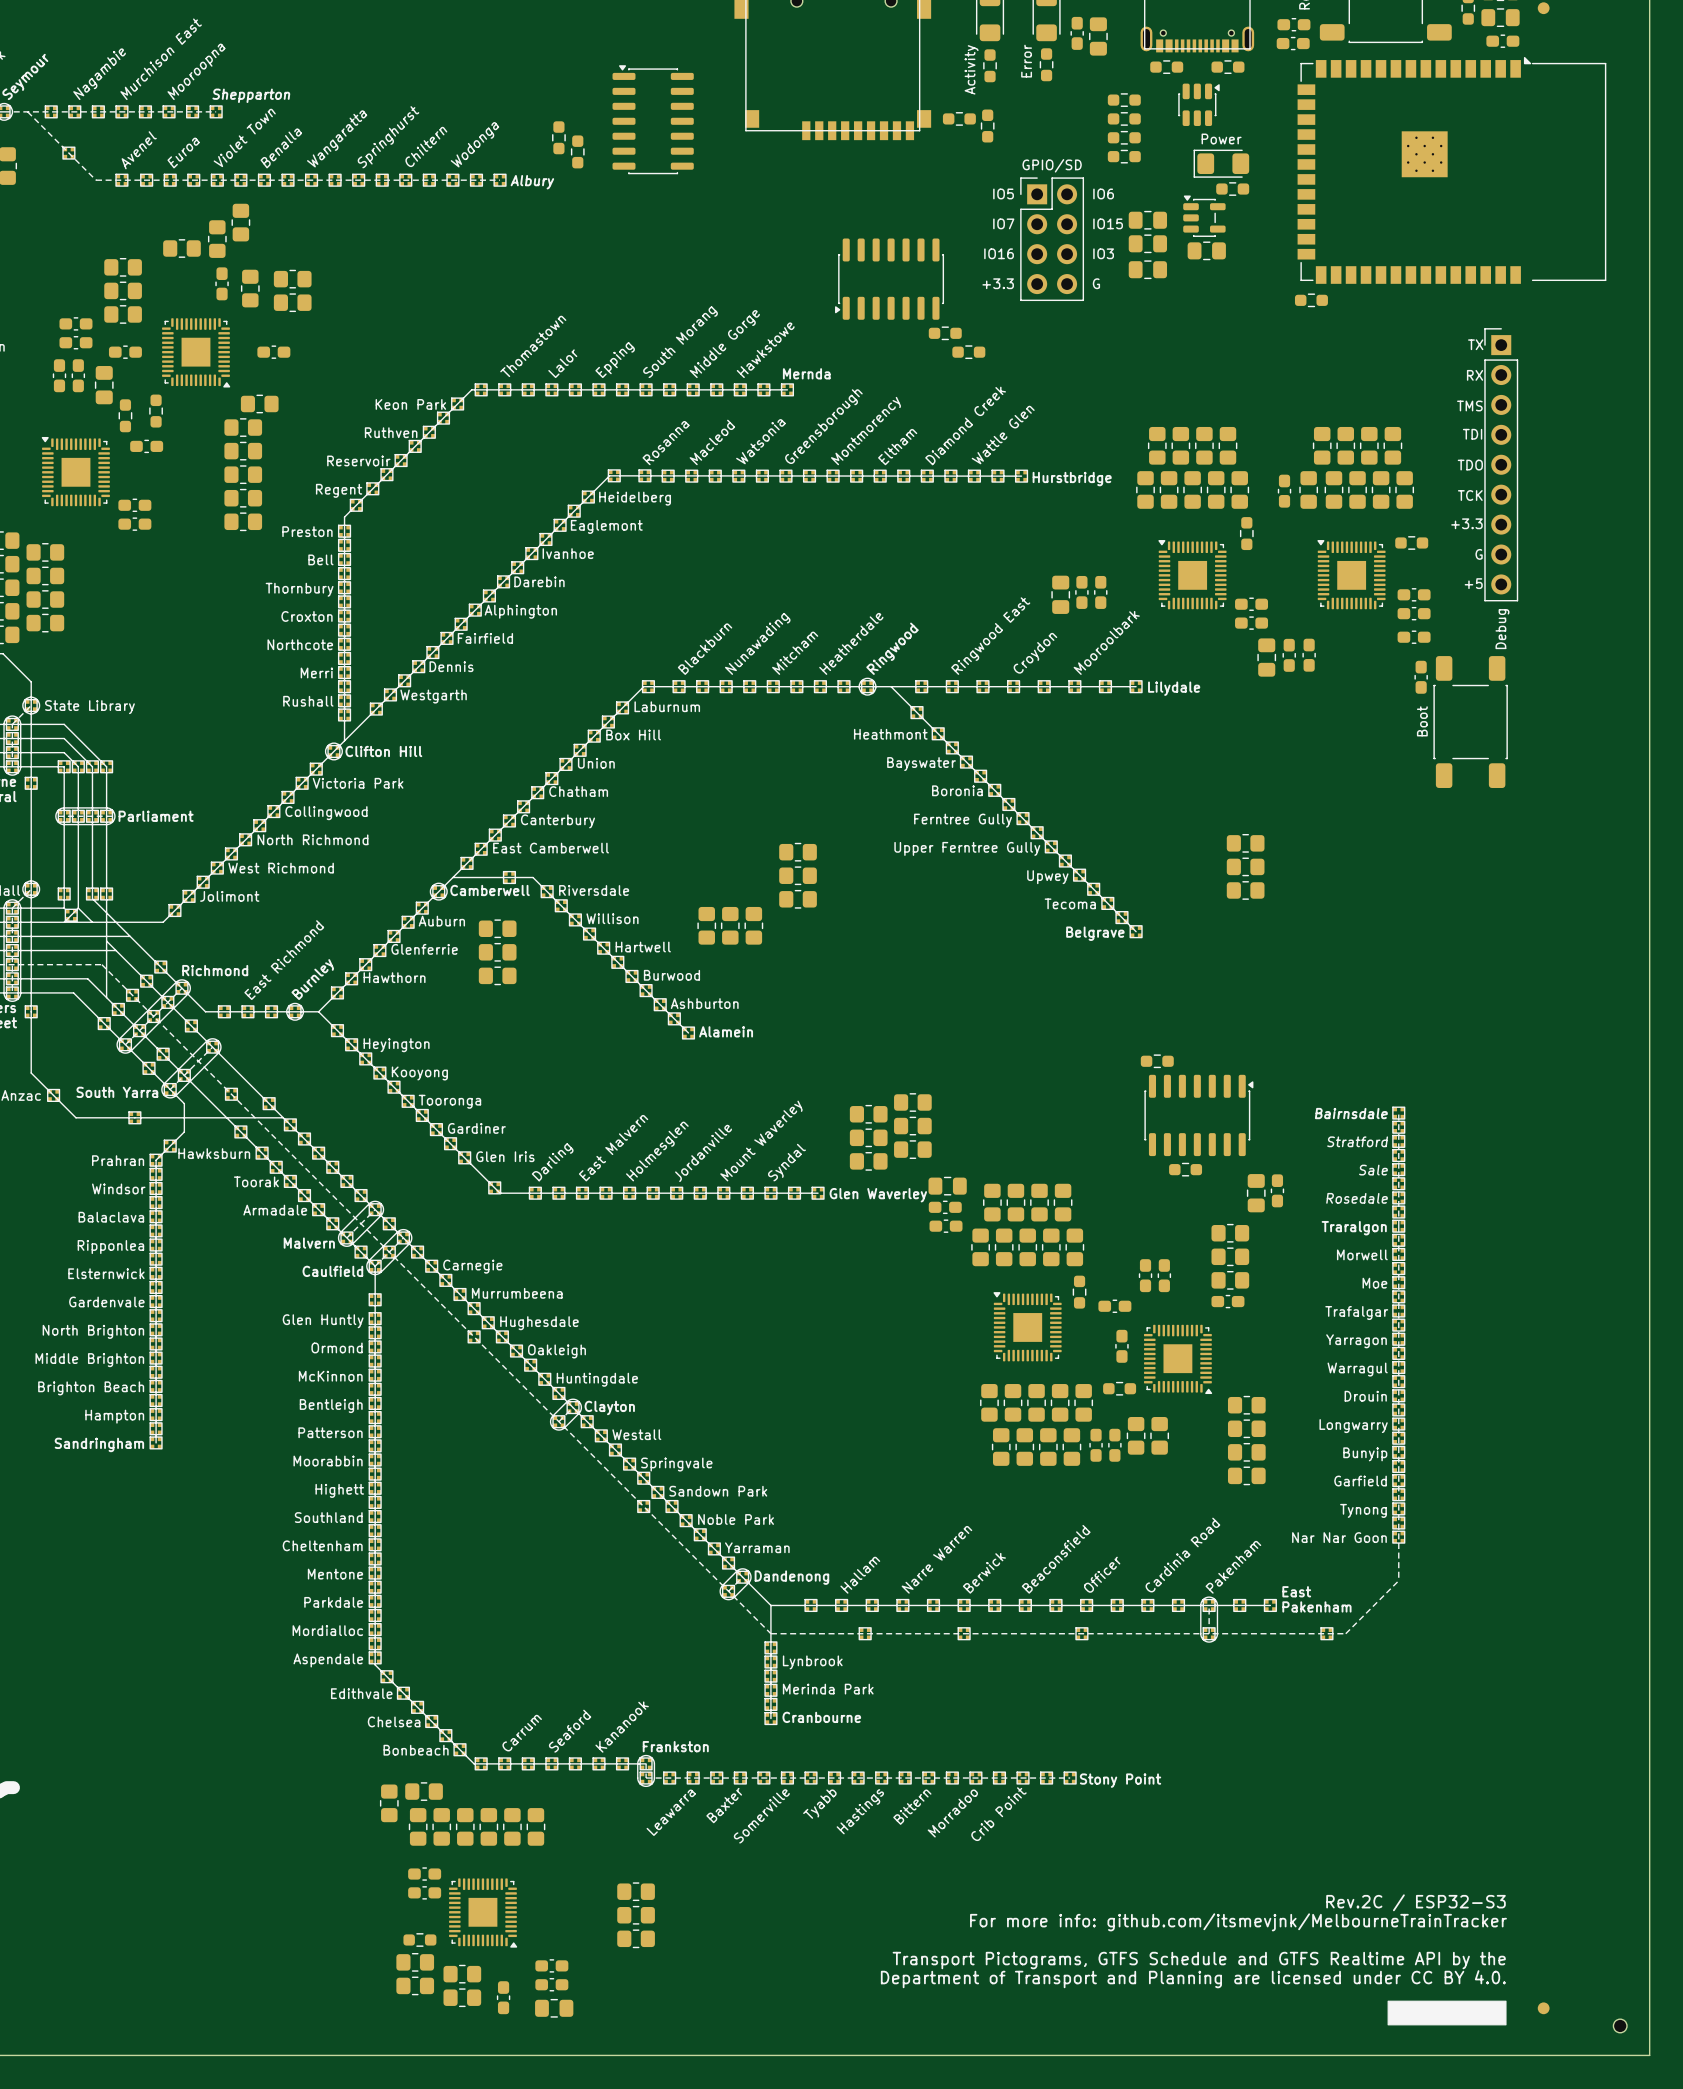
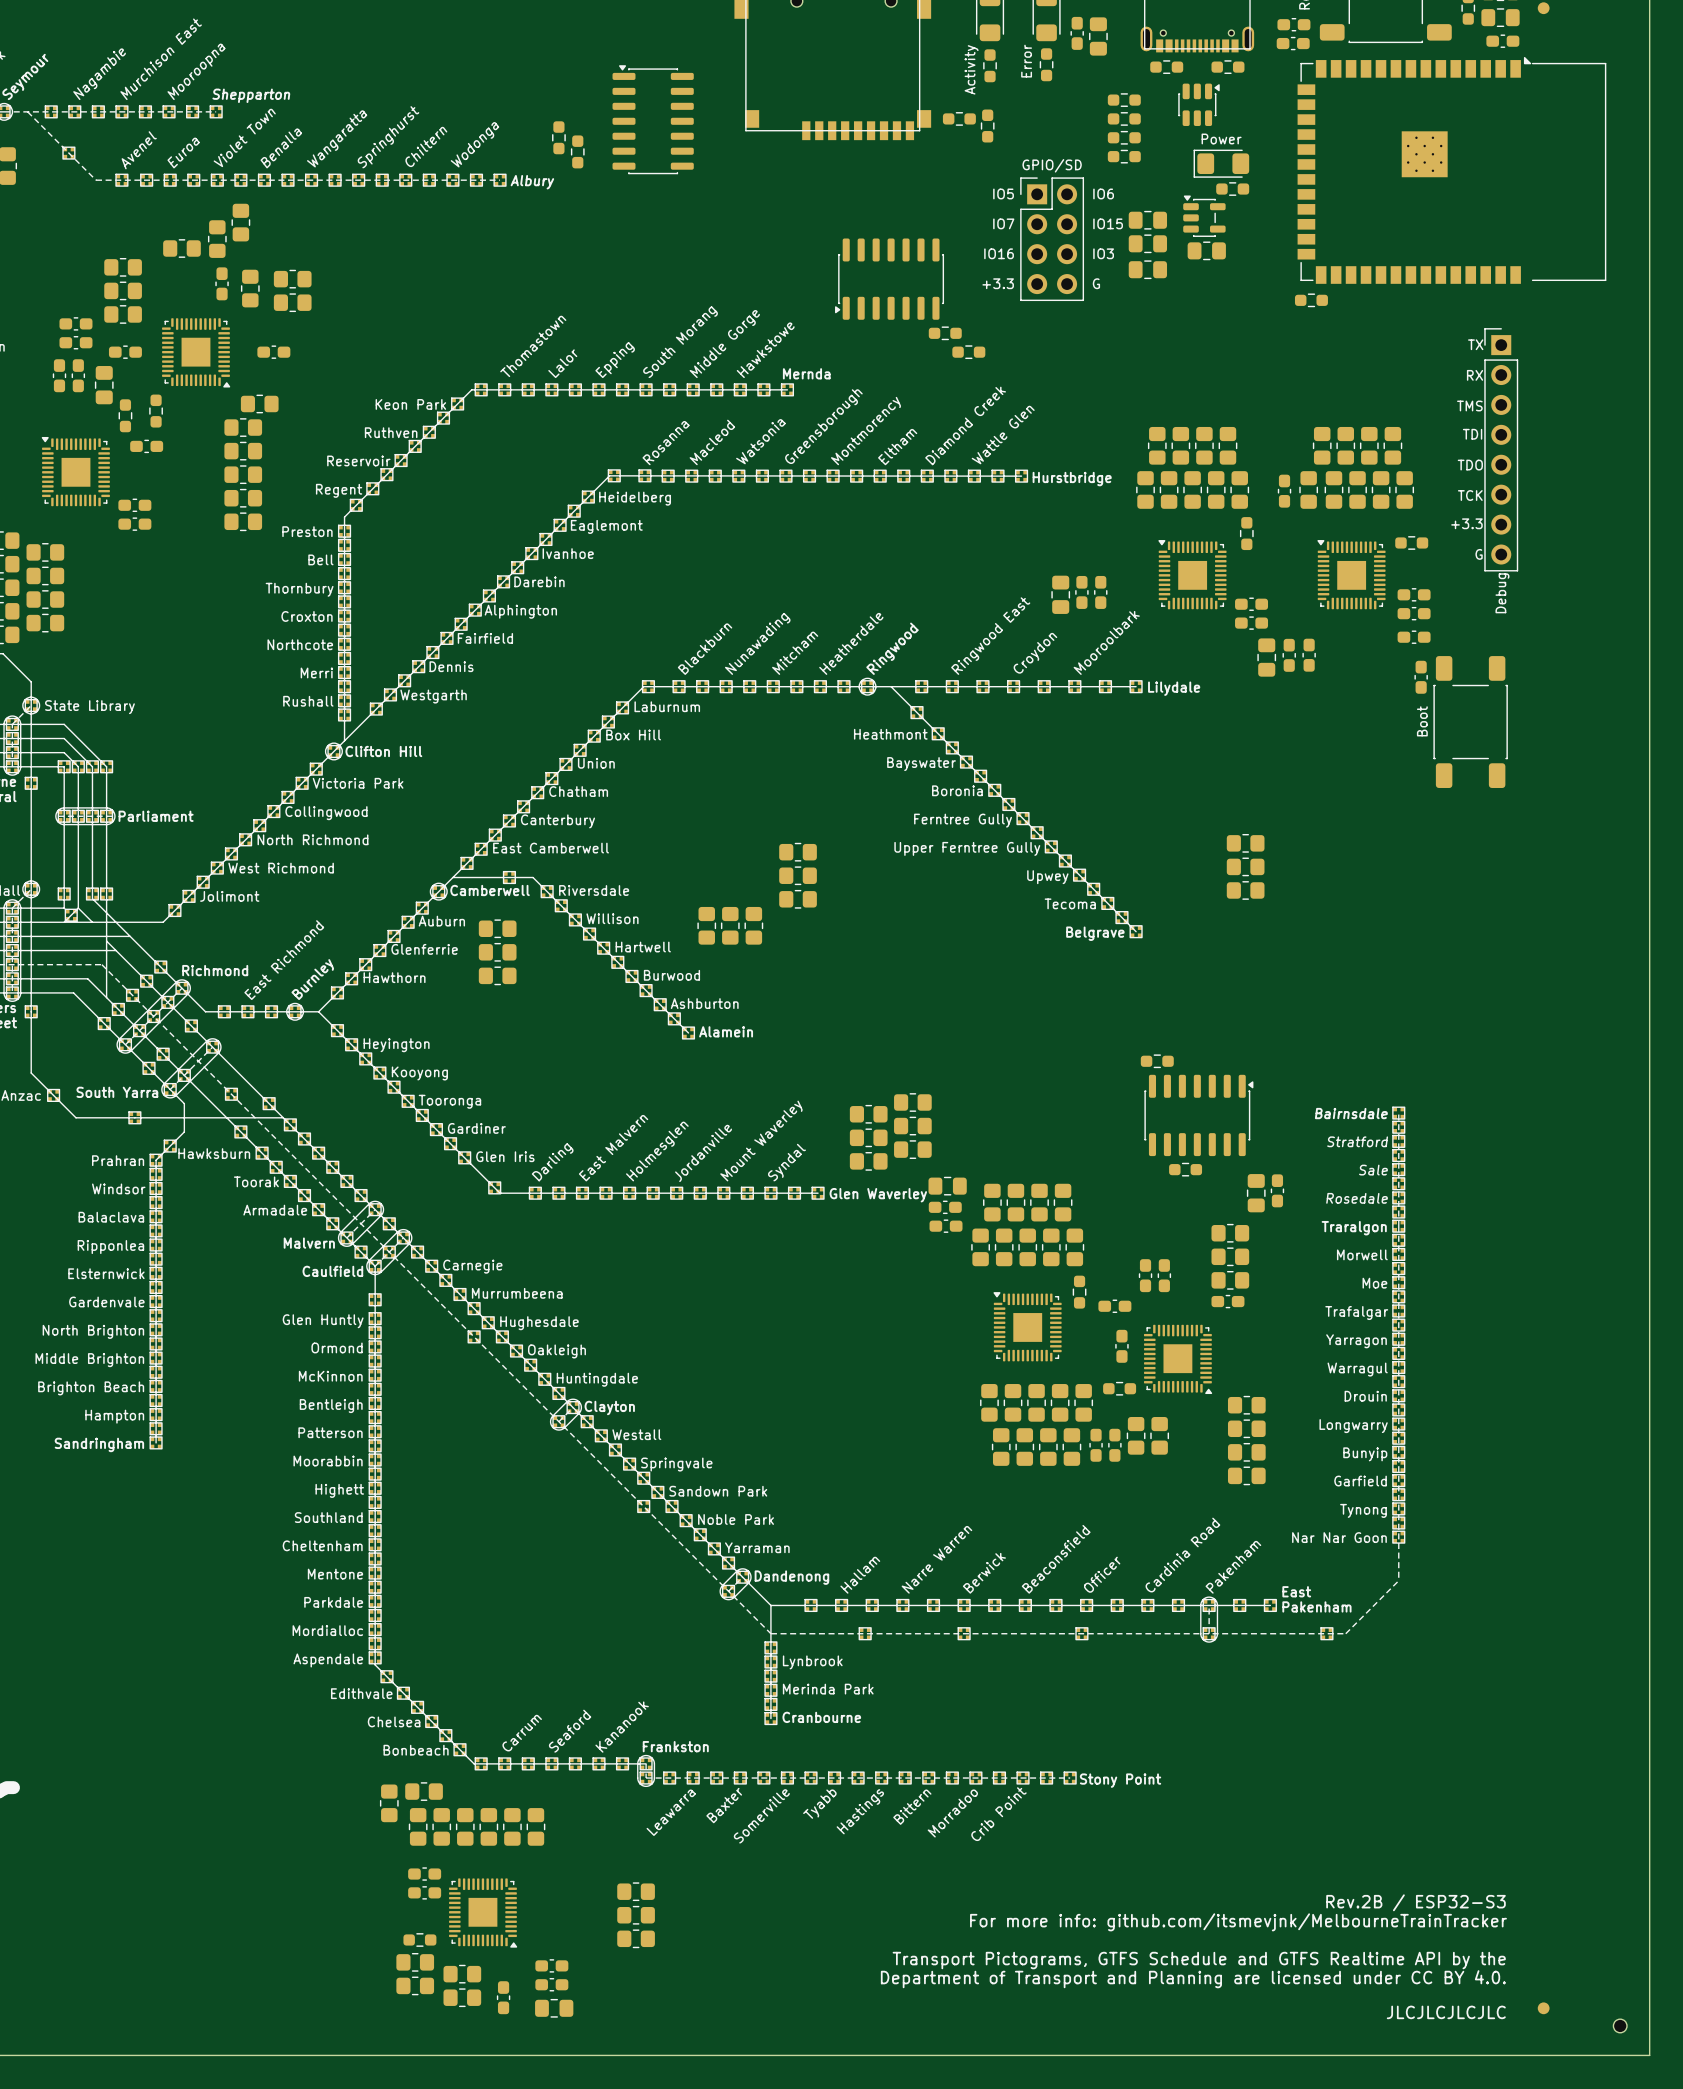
part: none -> (1501, 449)
part: (1501, 464) -> none
text: +5 (1473, 583) -> none
text position: Debug (1502, 629) -> Debug (1502, 593)
text: Rev.2C / ESP32-S3 (1416, 1902) -> Rev.2B / ESP32-S3 (1416, 1902)
drawing: [1387, 2000, 1507, 2026] -> none
text: none -> JLCJLCJLCJLC (1446, 2012)

